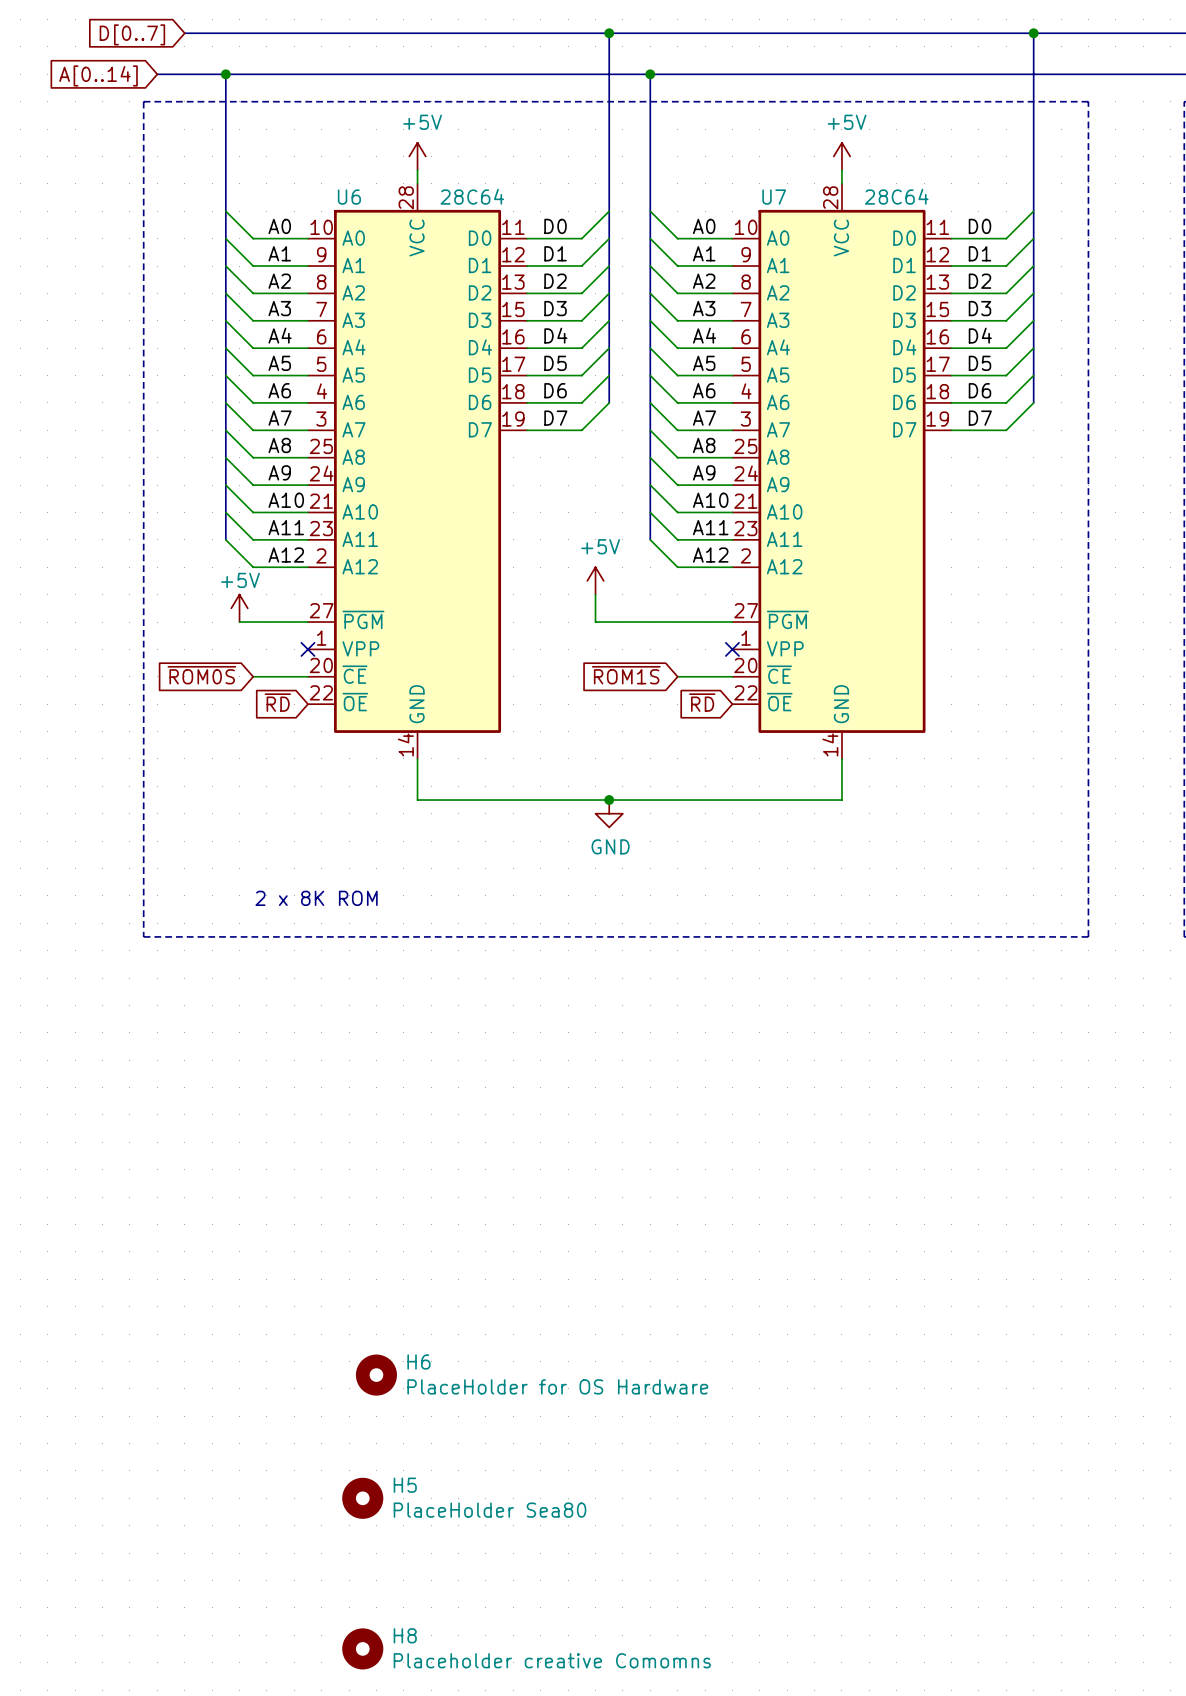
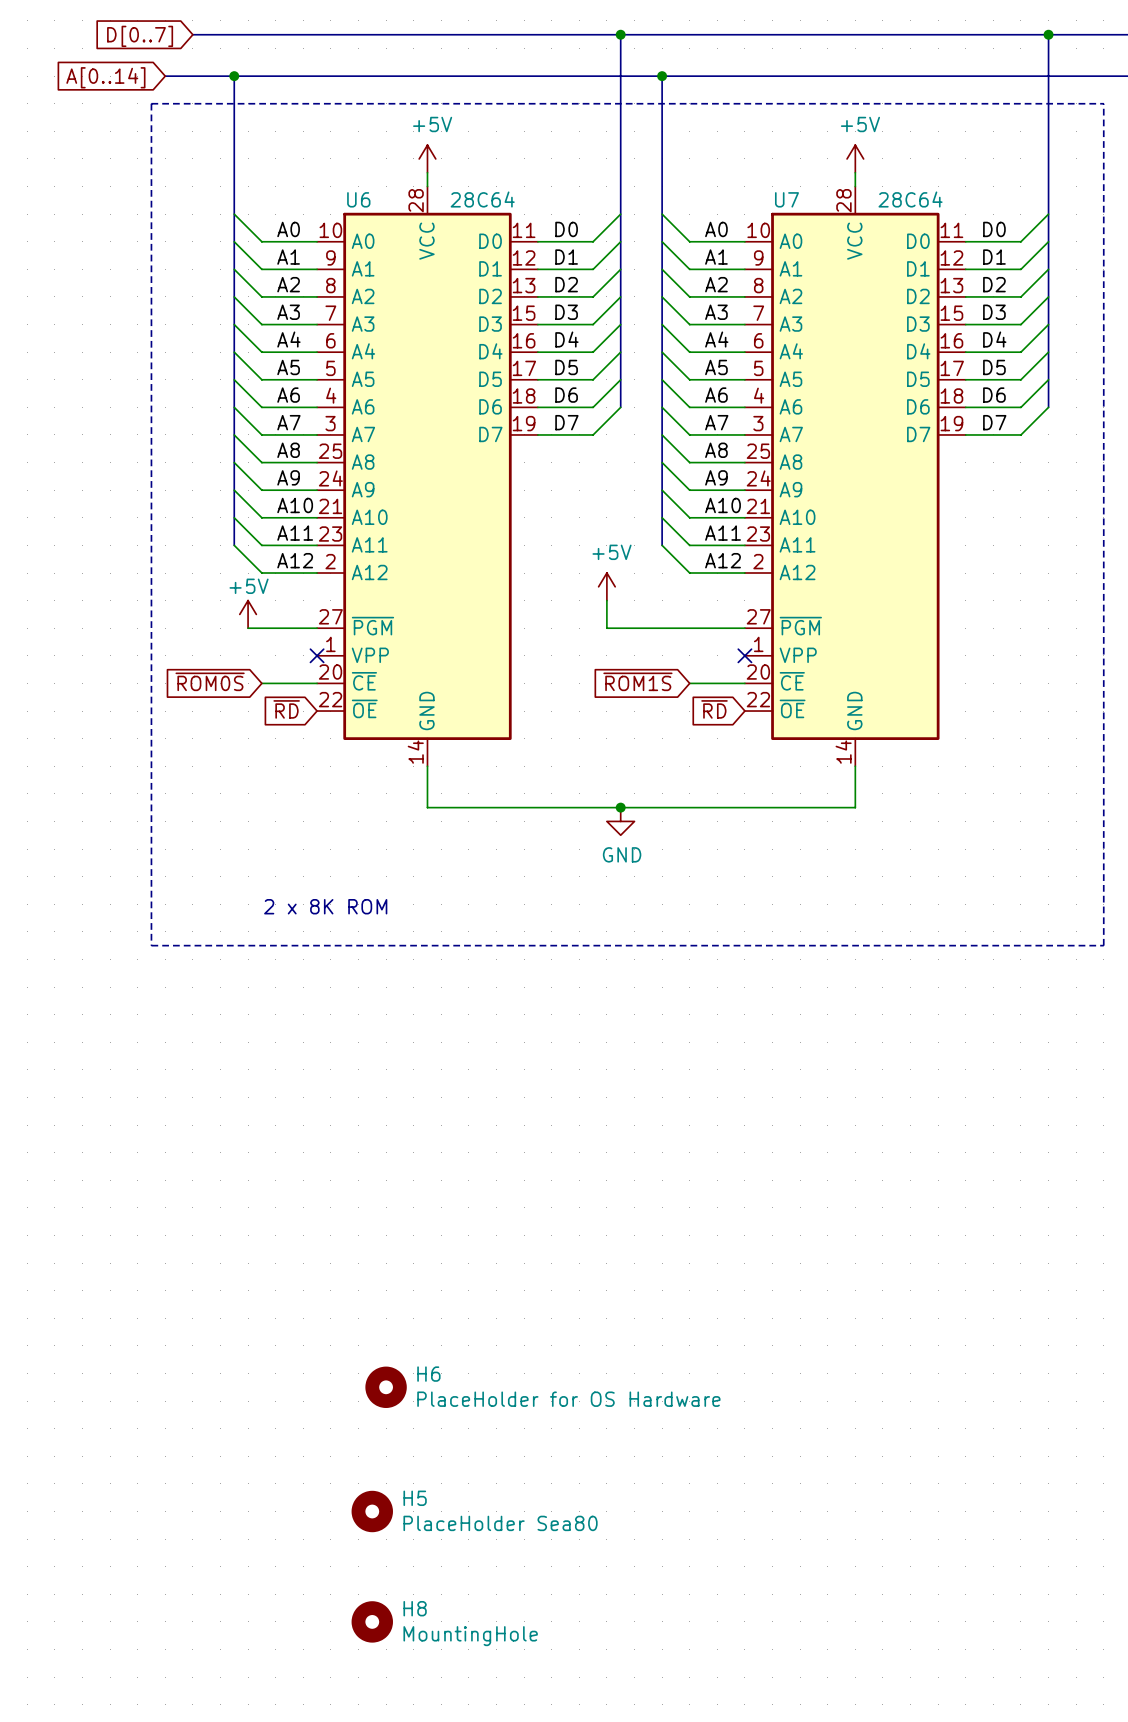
H8 position: (362, 1648) -> (372, 1621)
H8 value: Placeholder creative Comomns (552, 1660) -> MountingHole (470, 1636)

